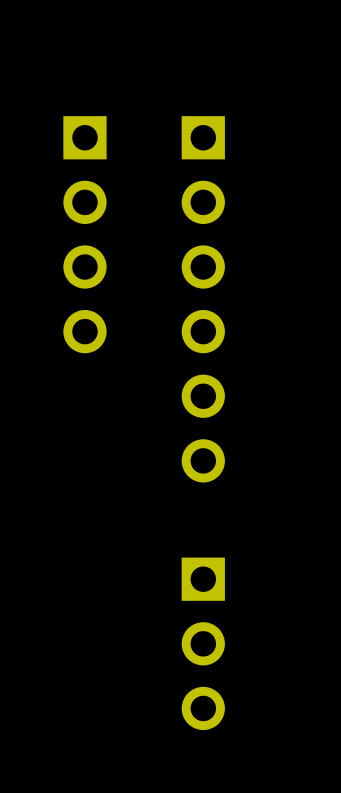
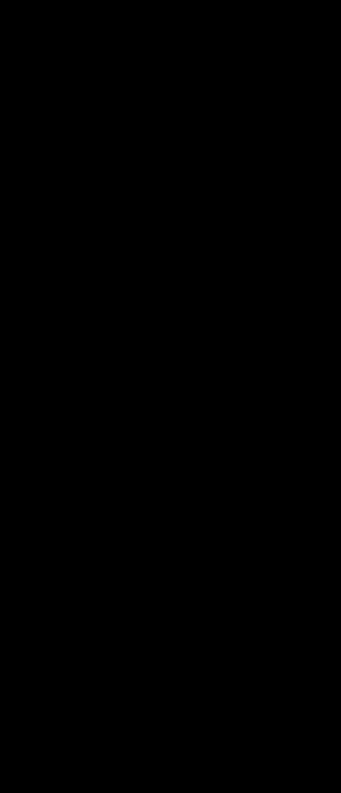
part: (84, 234) -> none
part: (203, 299) -> none
part: (203, 643) -> none

